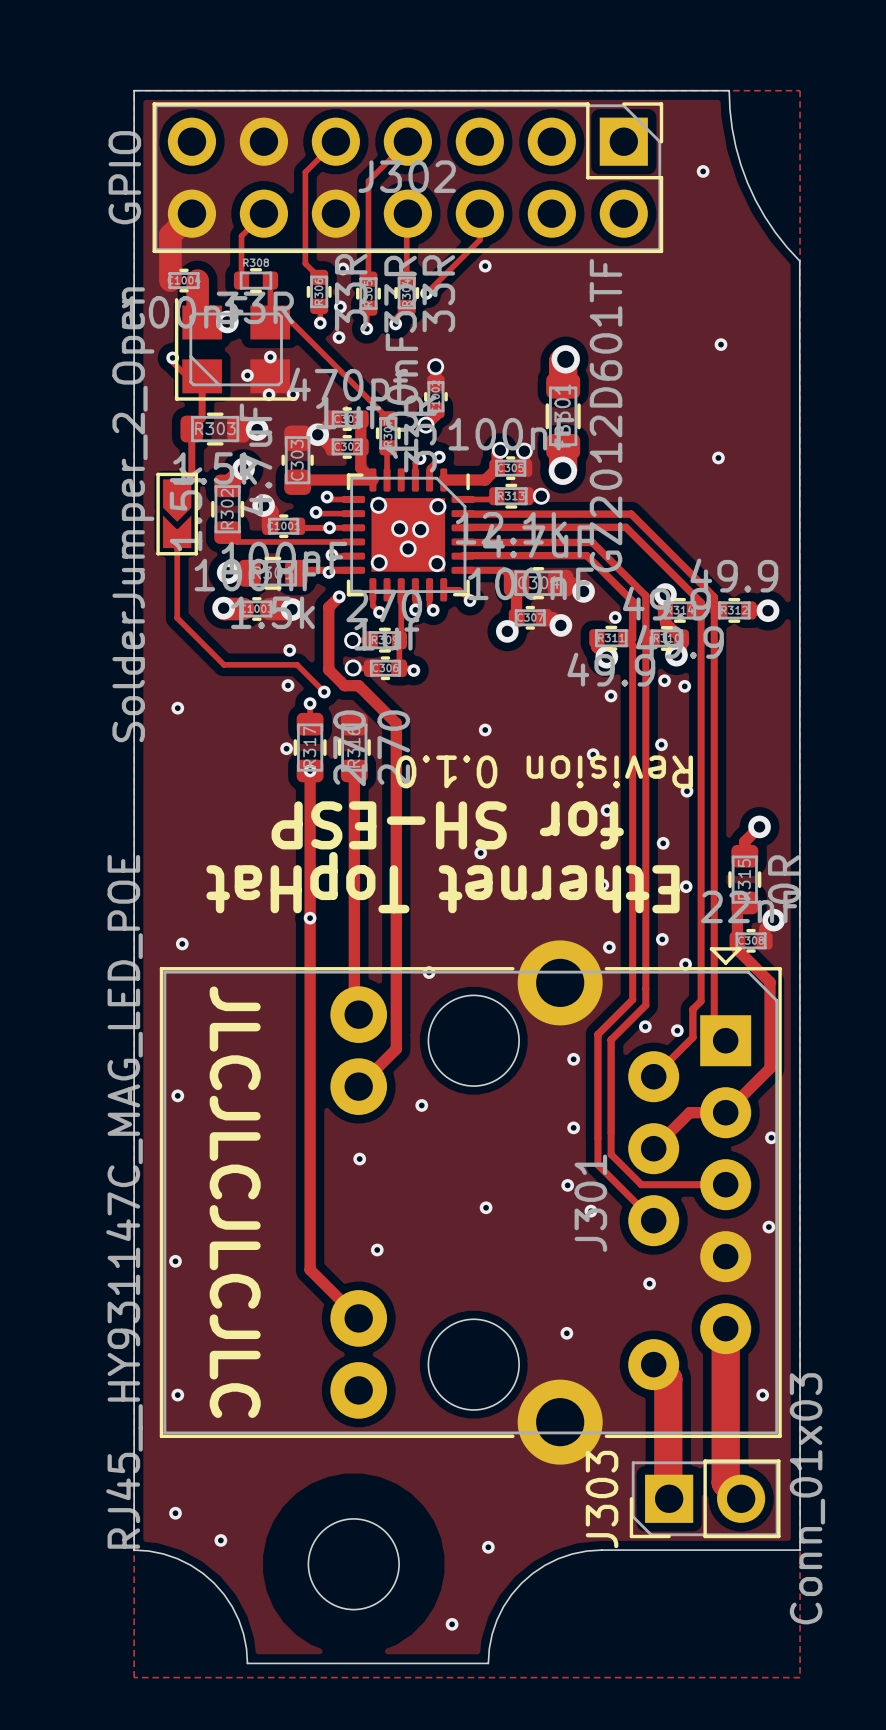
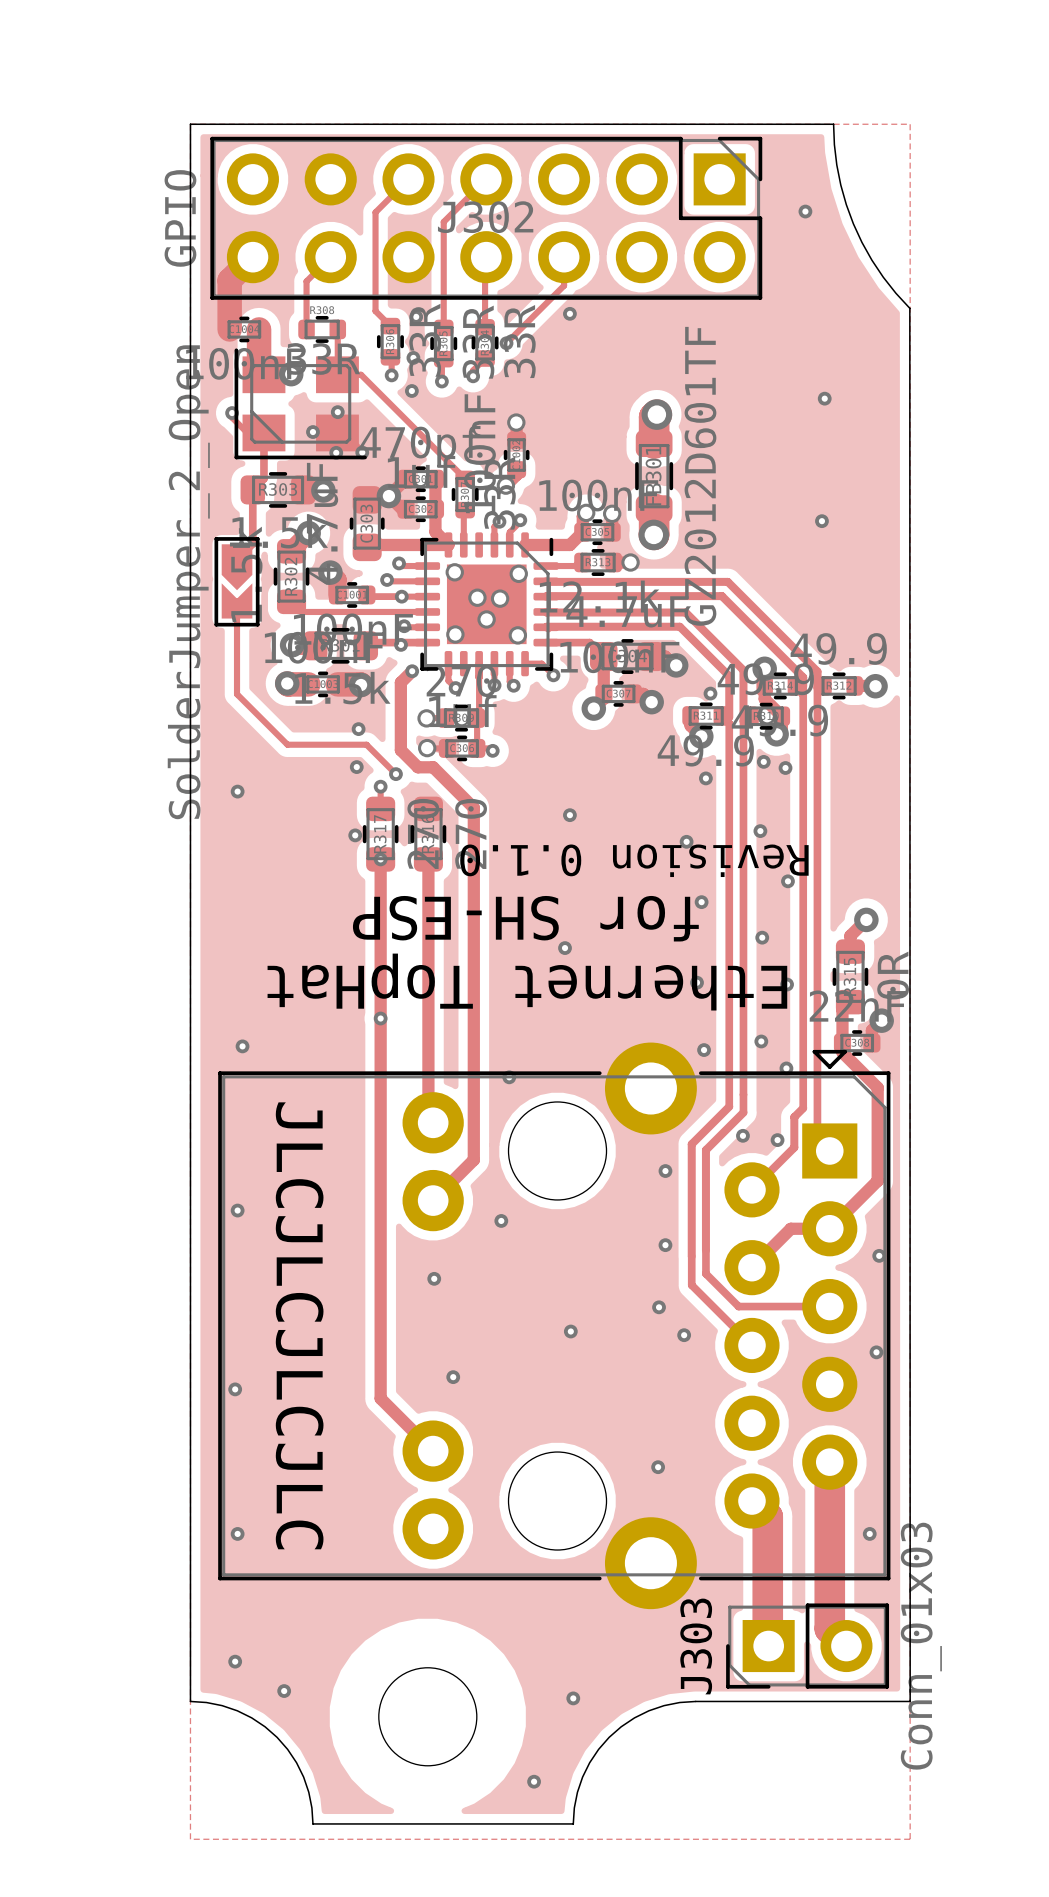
J301: RJ45__HY931147C_MAG_LED_POE (470, 1202) -> none
part: none -> (554, 1325)
via: (649, 1283) -> none

